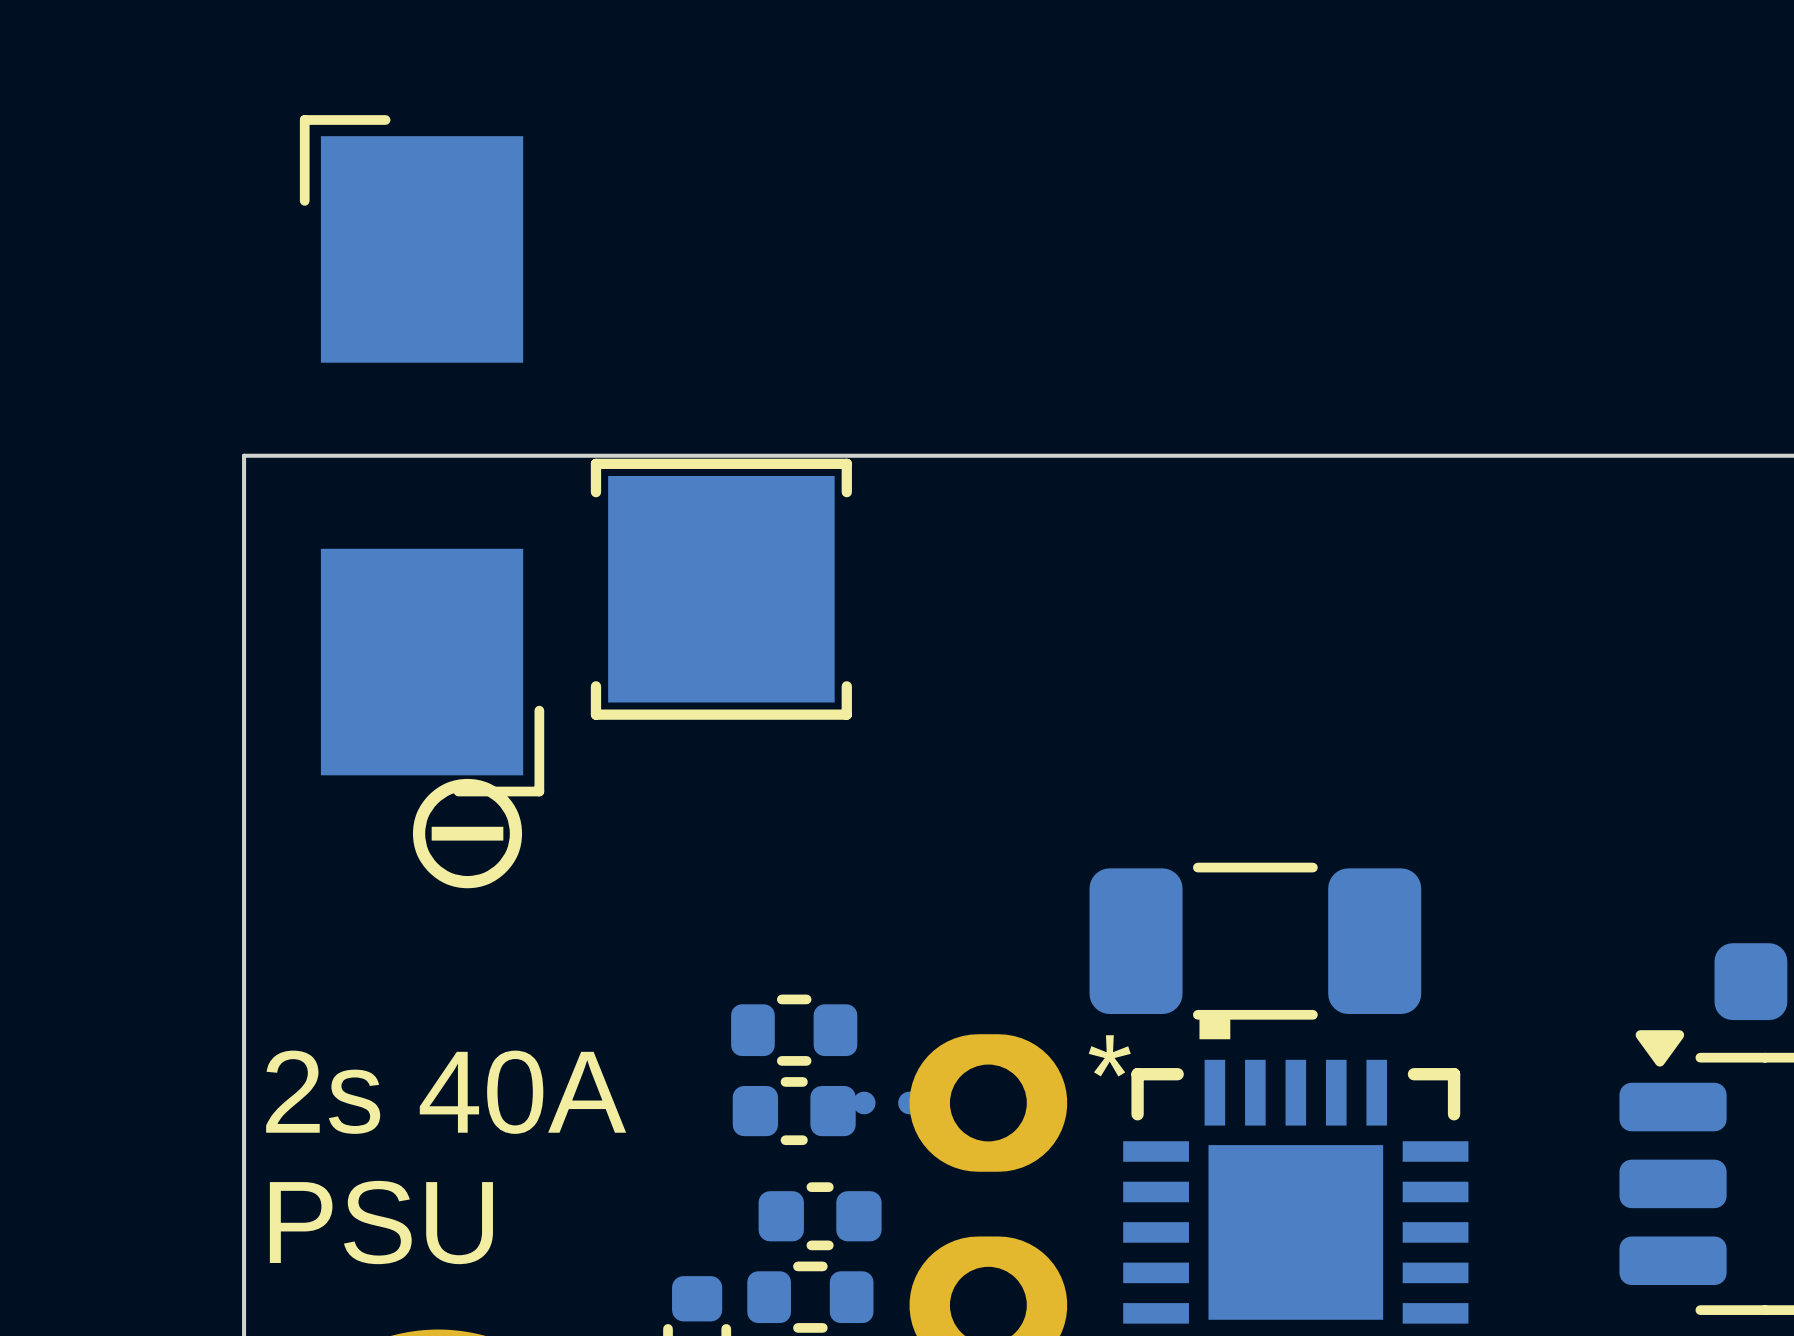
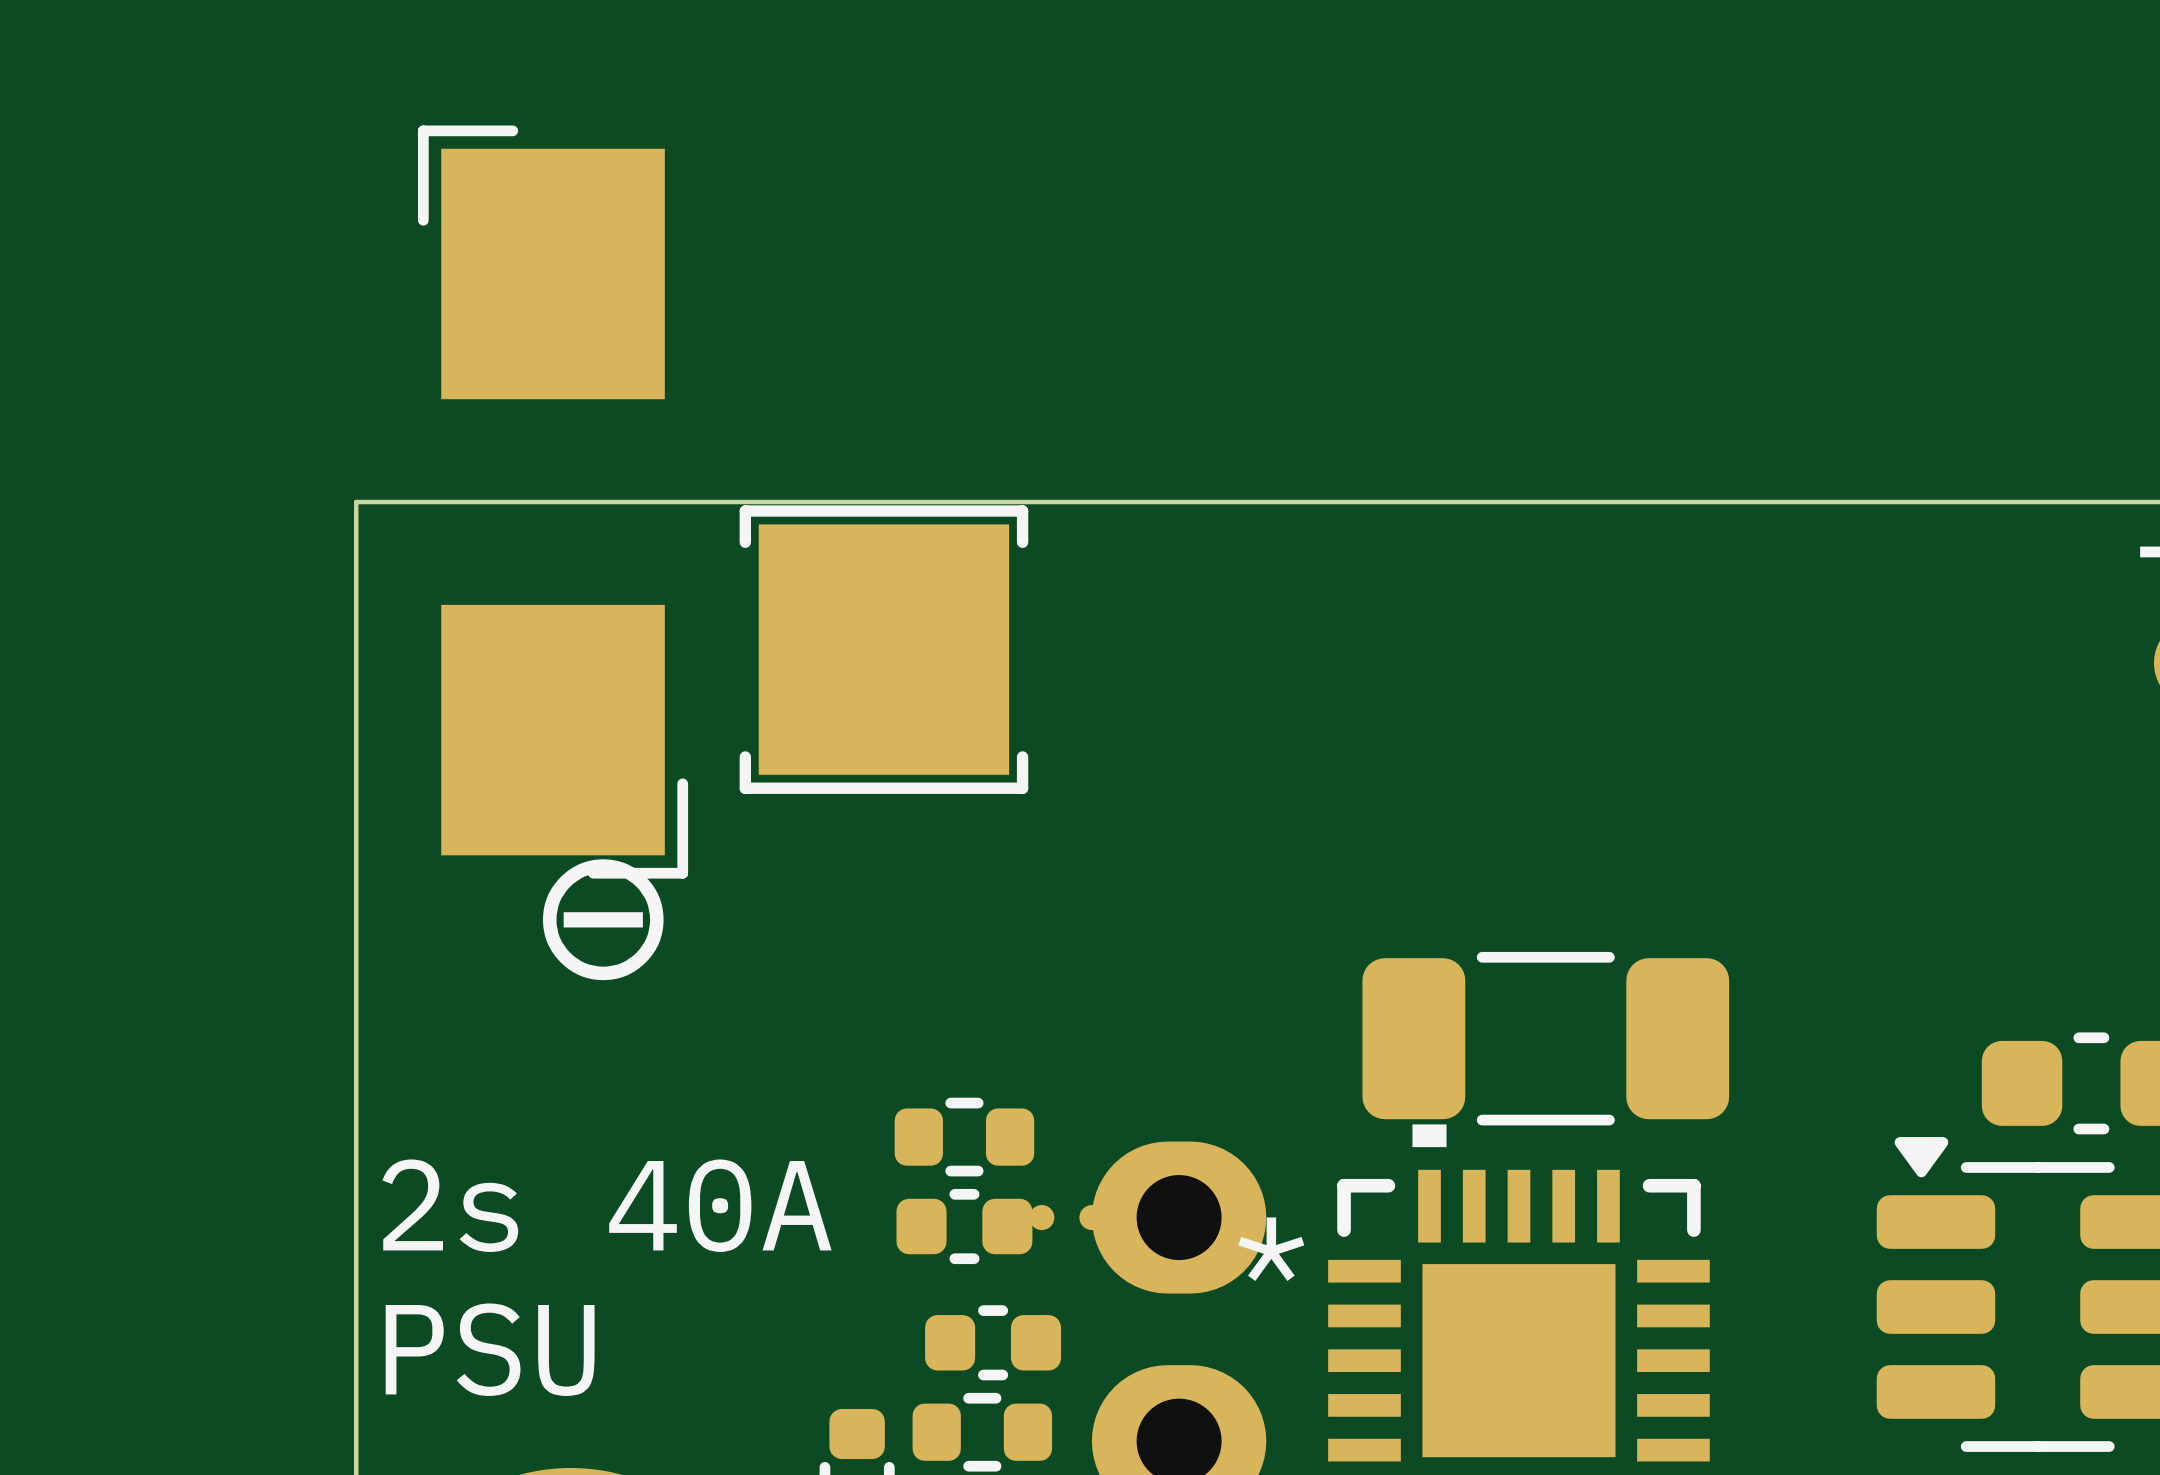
part position: (1255, 941) -> (1545, 1038)
part text position: * (1109, 1055) -> * (1271, 1249)

